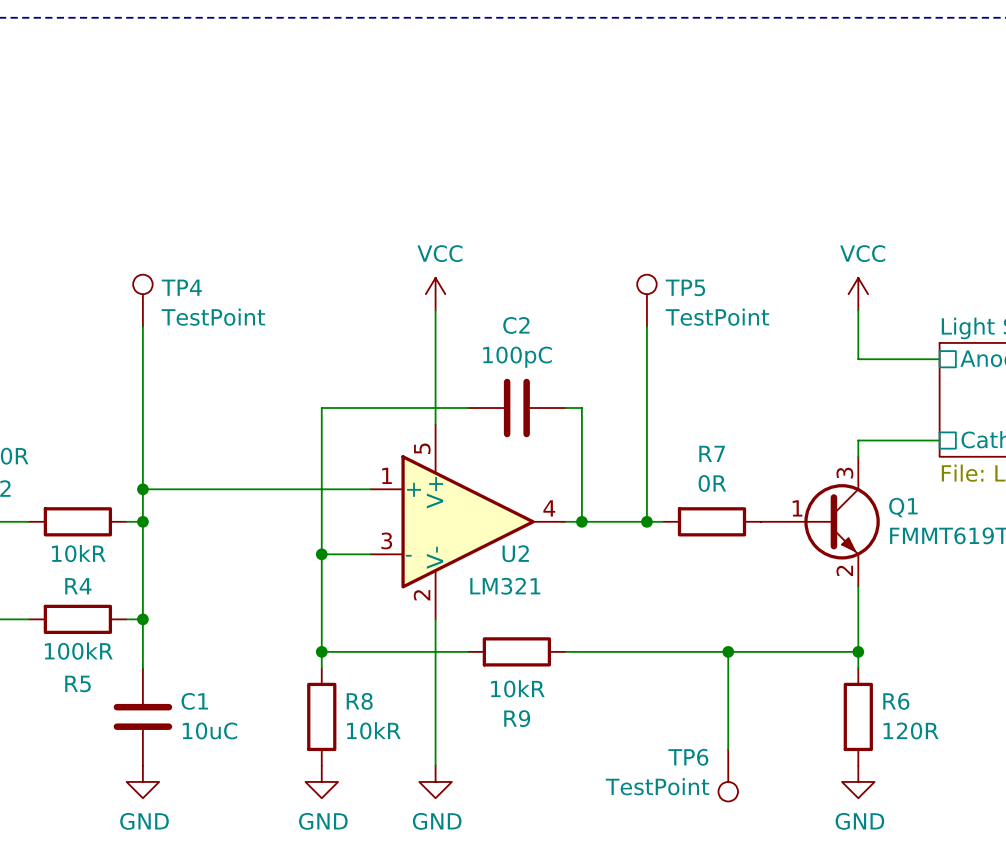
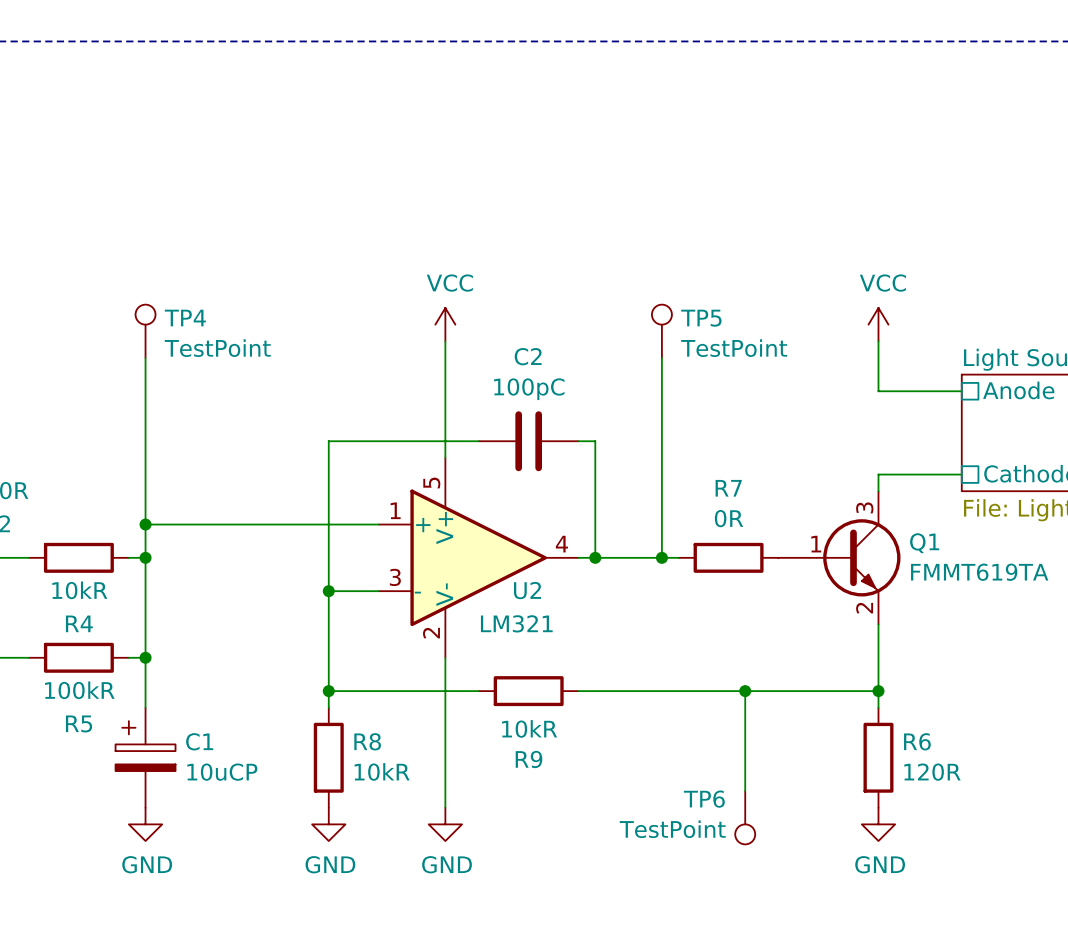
C1 symbol: [113, 668, 173, 766] -> [115, 707, 176, 808]
C1 value: 10uC (209, 730) -> 10uCP (222, 772)

